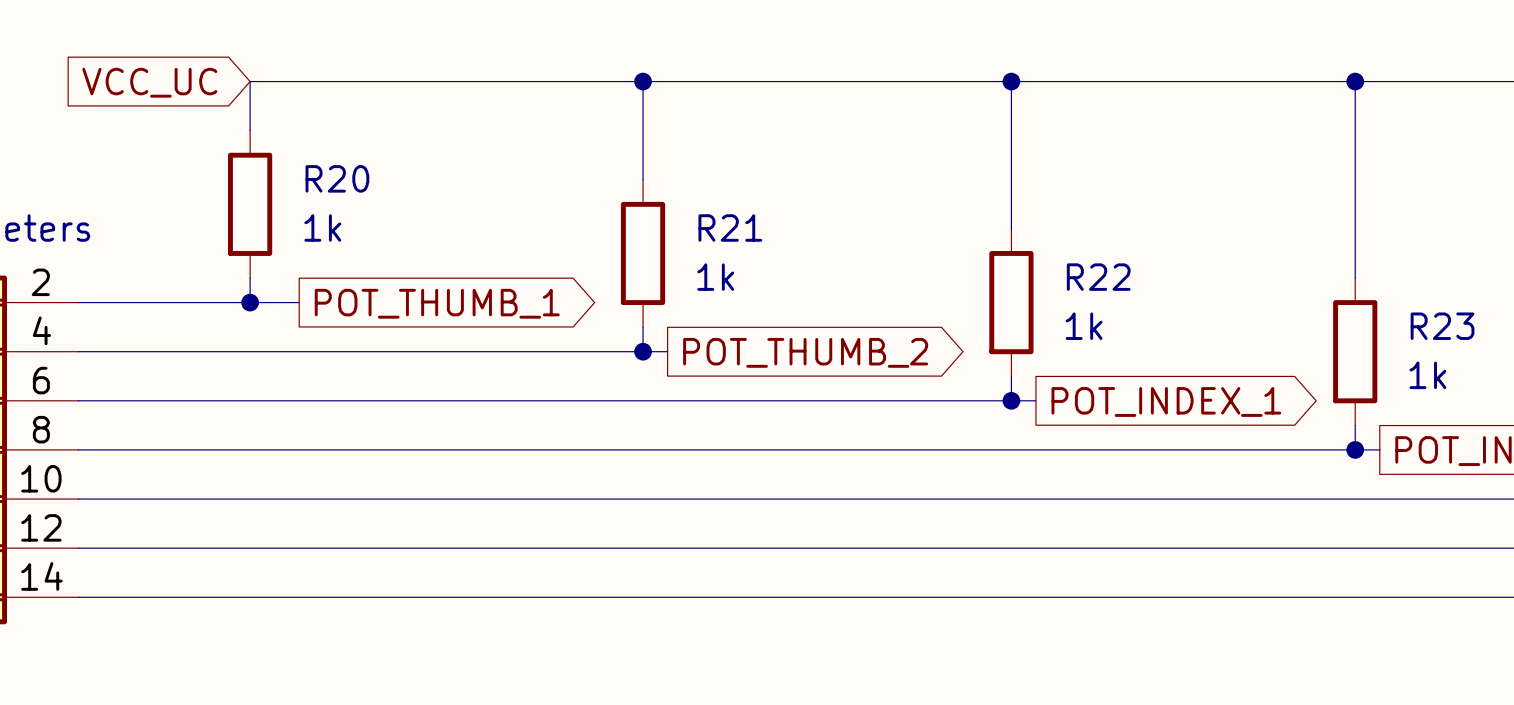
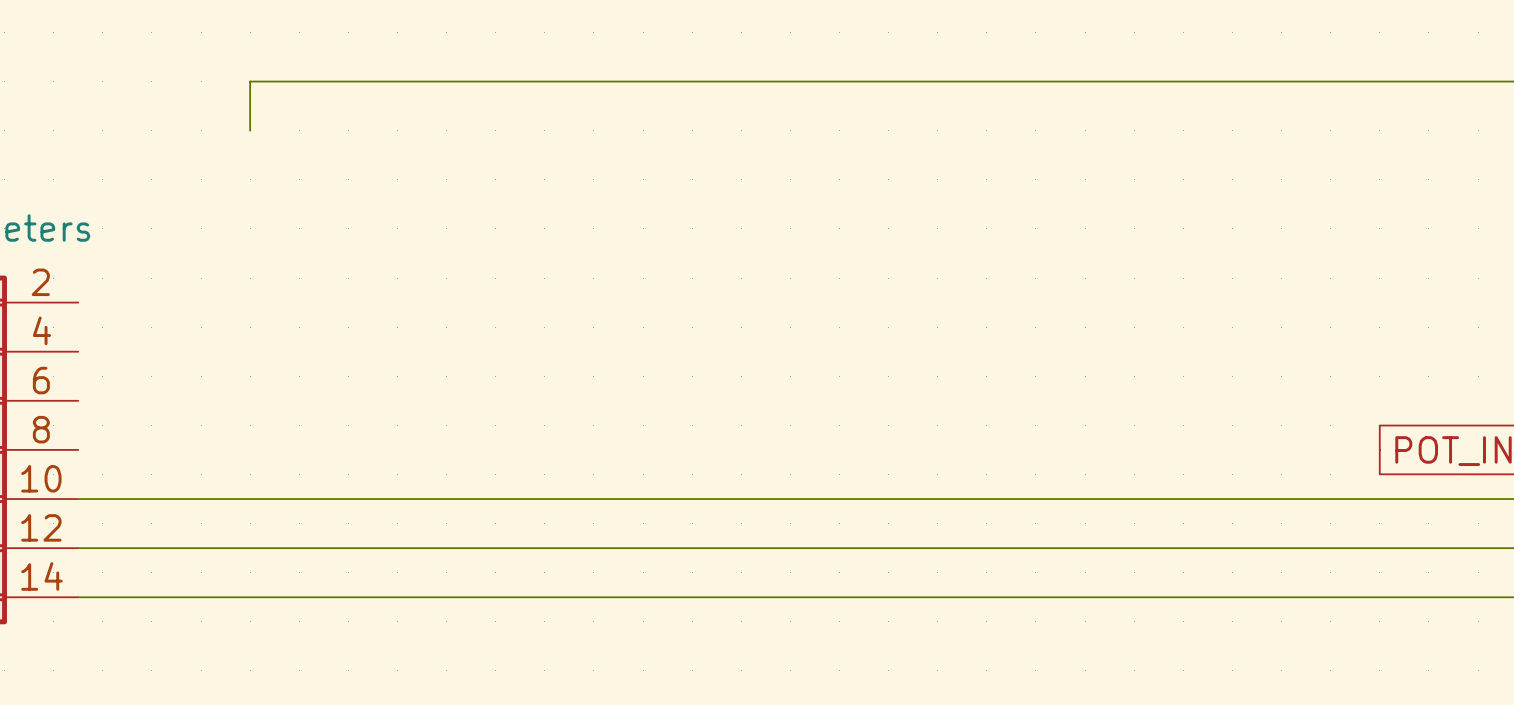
wire: (643, 81) (643, 179) -> none
junction: (643, 81) -> none
wire: (1011, 81) (1011, 228) -> none
junction: (1011, 81) -> none
wire: (1355, 81) (1355, 278) -> none
junction: (1355, 81) -> none
global label: VCC_UC (149, 82) -> none
R20: 1k (250, 204) -> none
R21: 1k (643, 253) -> none
wire: (250, 278) (250, 302) -> none
wire: (78, 302) (299, 302) -> none
junction: (250, 302) -> none
R22: 1k (1011, 302) -> none
global label: POT_THUMB_1 (437, 303) -> none
wire: (643, 327) (643, 351) -> none
wire: (78, 351) (667, 351) -> none
junction: (643, 351) -> none
R23: 1k (1355, 351) -> none
global label: POT_THUMB_2 (805, 352) -> none
wire: (1011, 376) (1011, 400) -> none
wire: (78, 400) (1035, 400) -> none
junction: (1011, 400) -> none
global label: POT_INDEX_1 (1166, 401) -> none
wire: (1355, 425) (1355, 449) -> none
wire: (78, 449) (1379, 449) -> none
junction: (1355, 449) -> none

